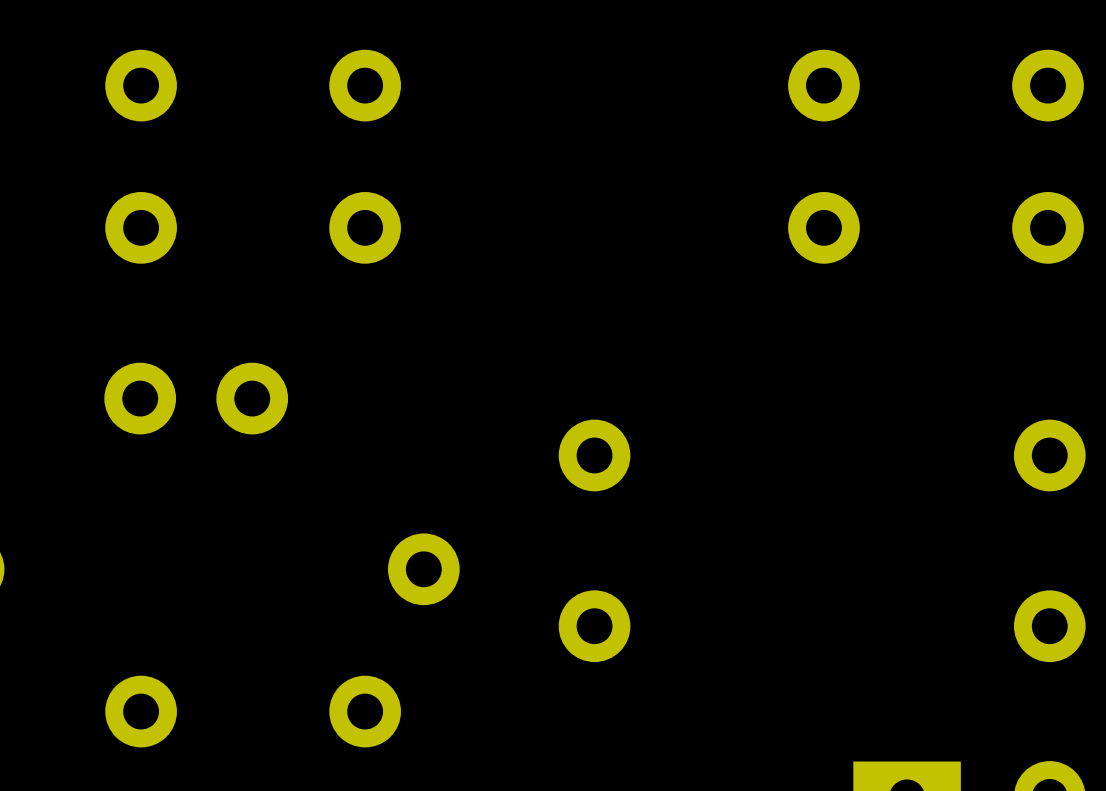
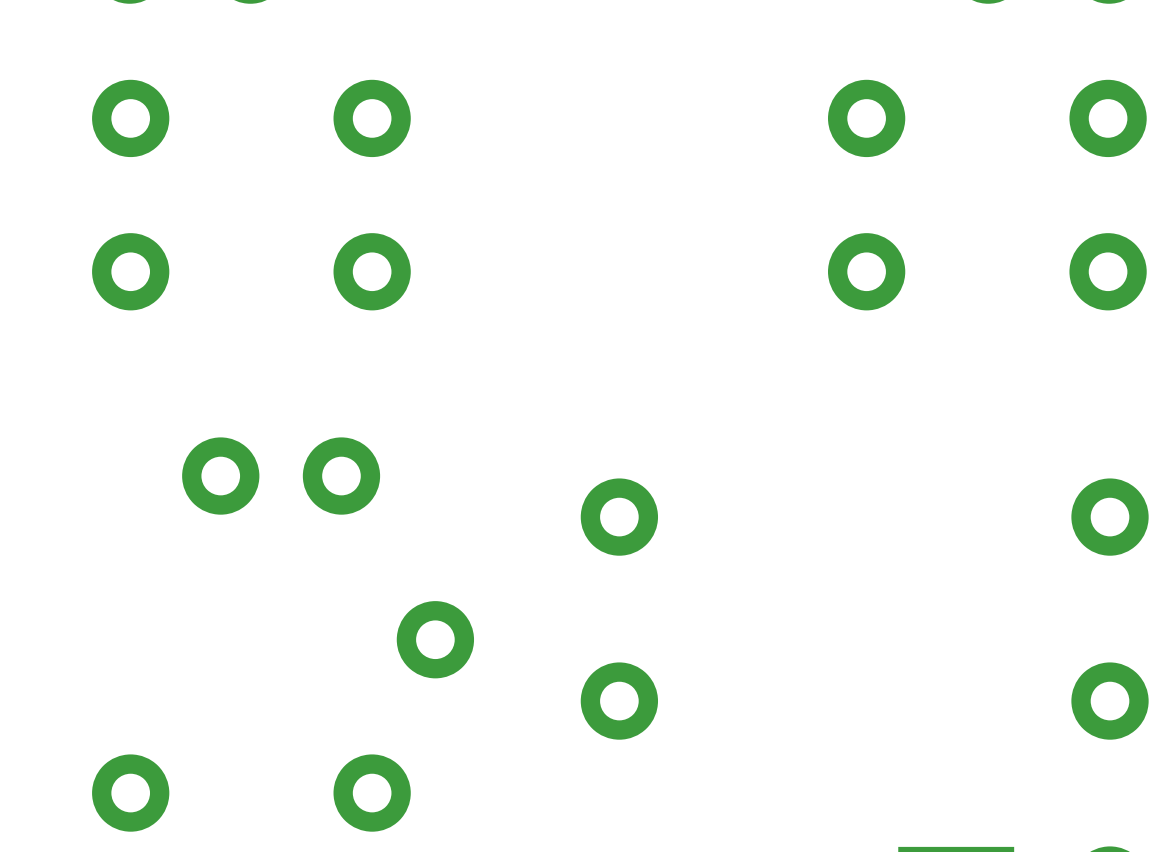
part position: (196, 398) -> (281, 476)

